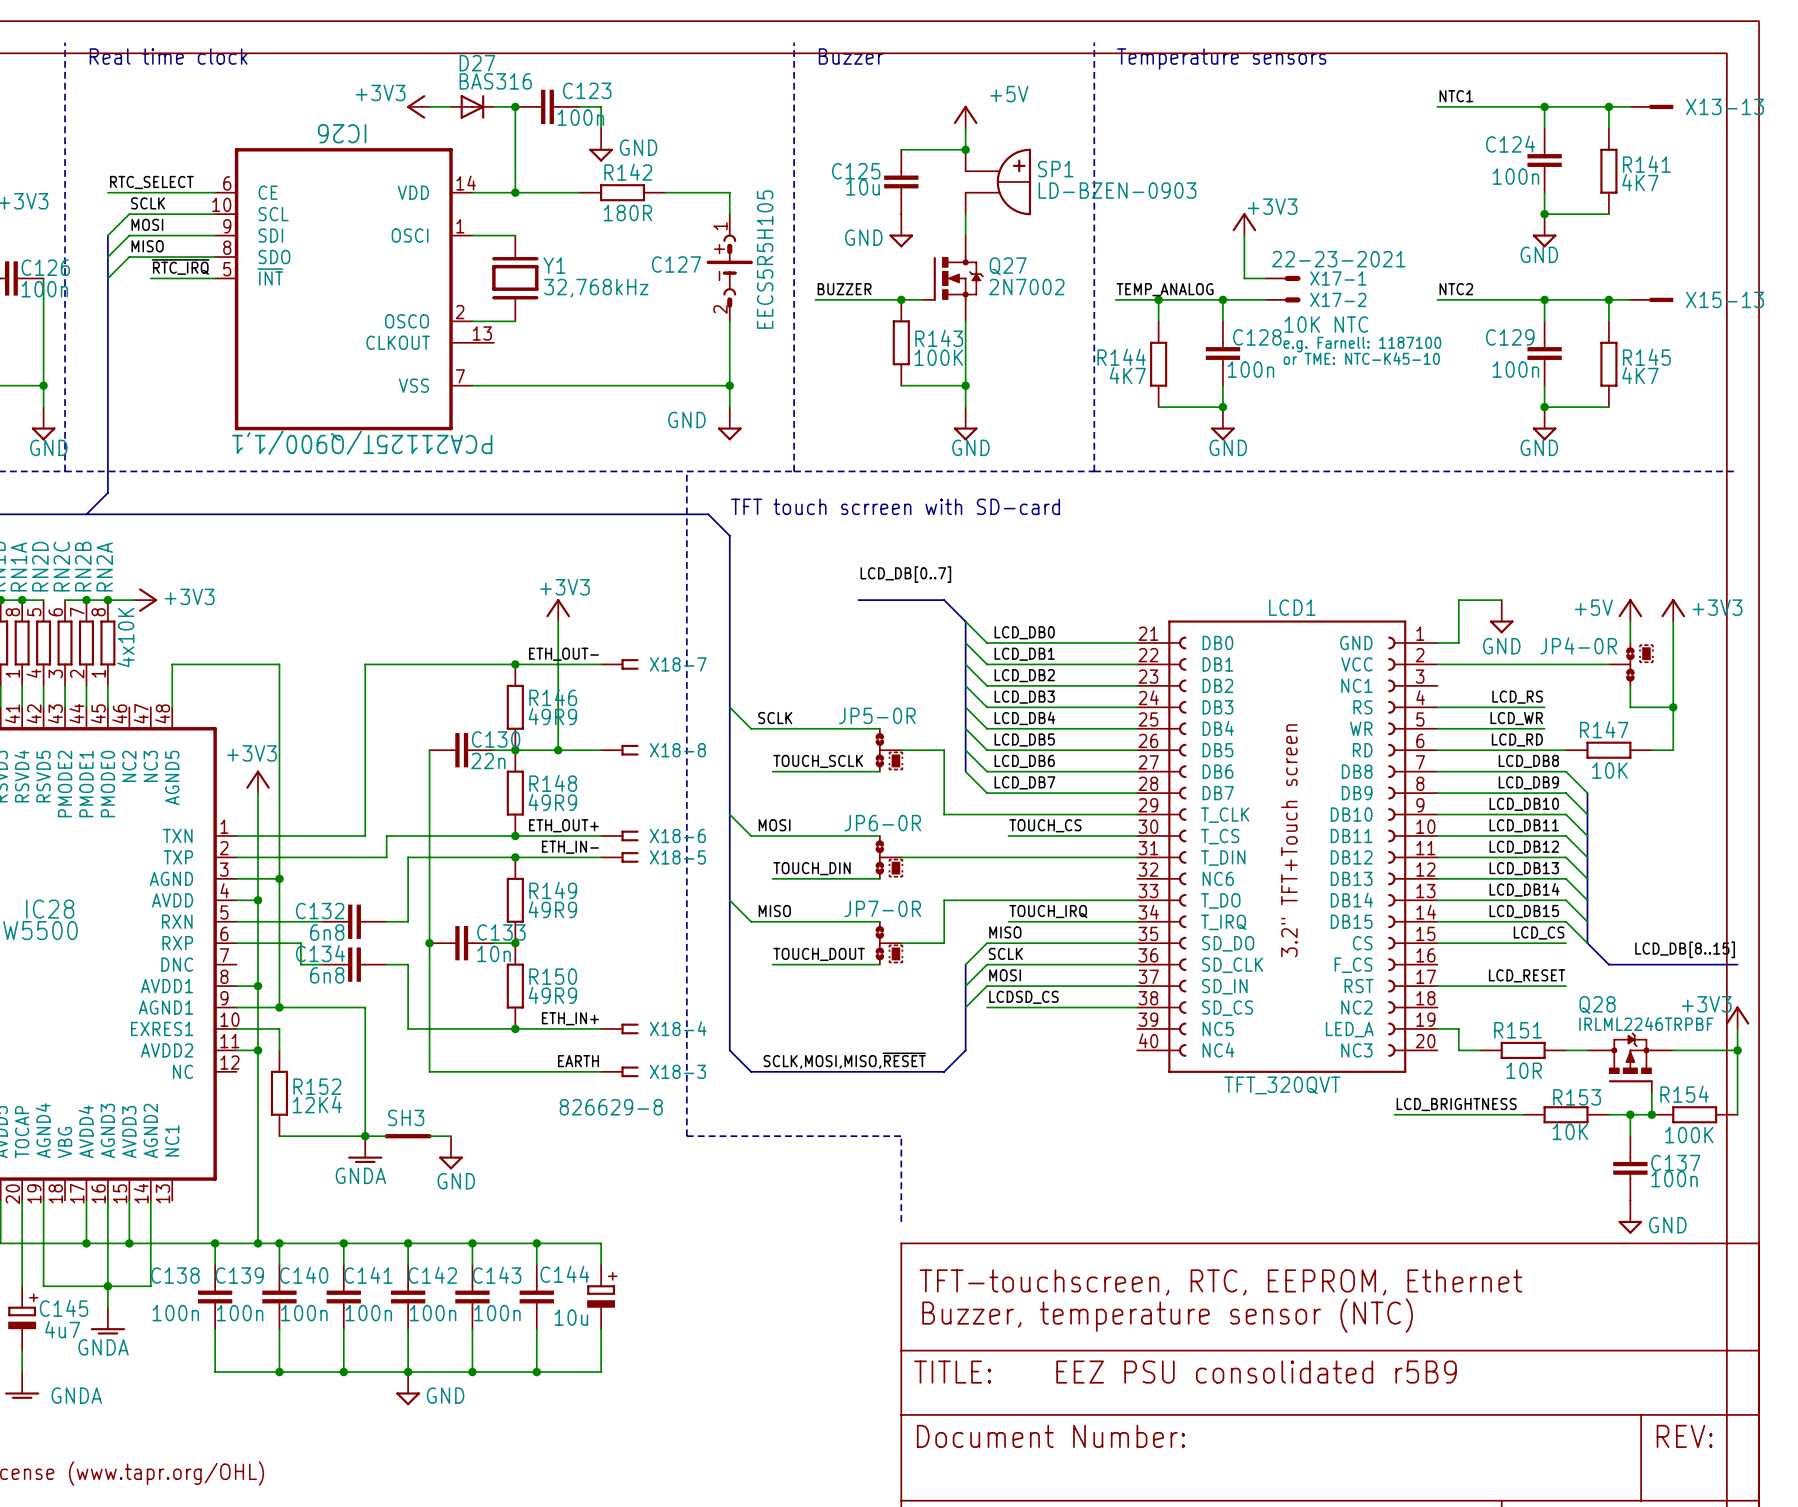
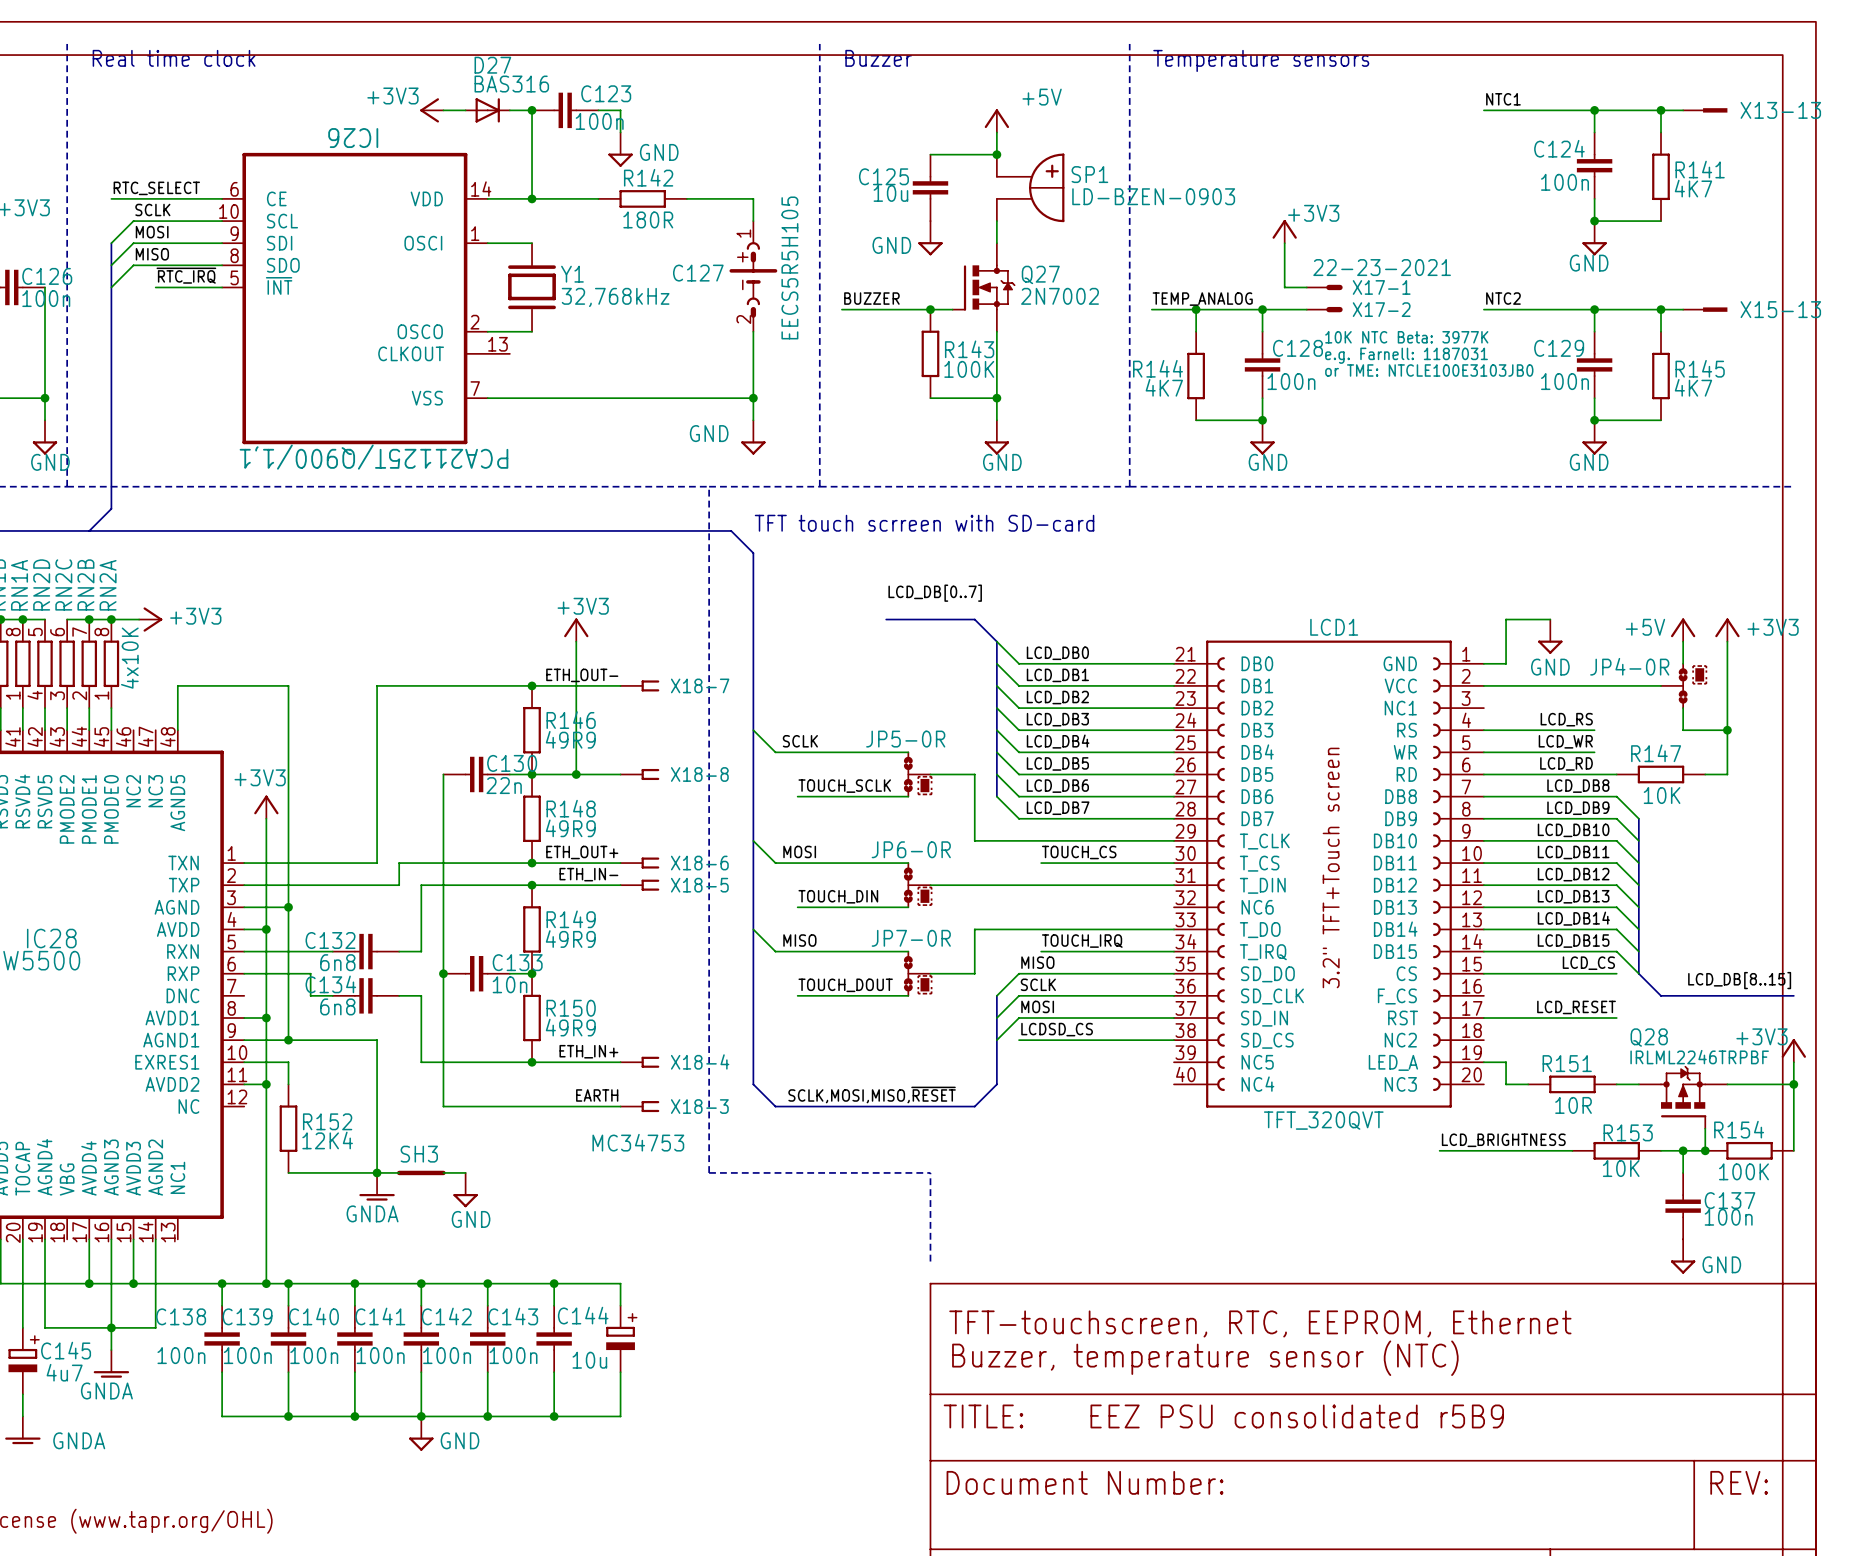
text: 10K NTC (1326, 324) -> 10K NTC Beta: 3977K (1406, 337)
text: e.g. Farnell: 1187100 (1362, 344) -> e.g. Farnell: 1187031 (1406, 355)
text: or TME: NTC-K45-10 (1361, 358) -> or TME: NTCLE100E3103JB0 (1429, 370)
part value: 826629-8 (611, 1107) -> MC34753 (638, 1142)

